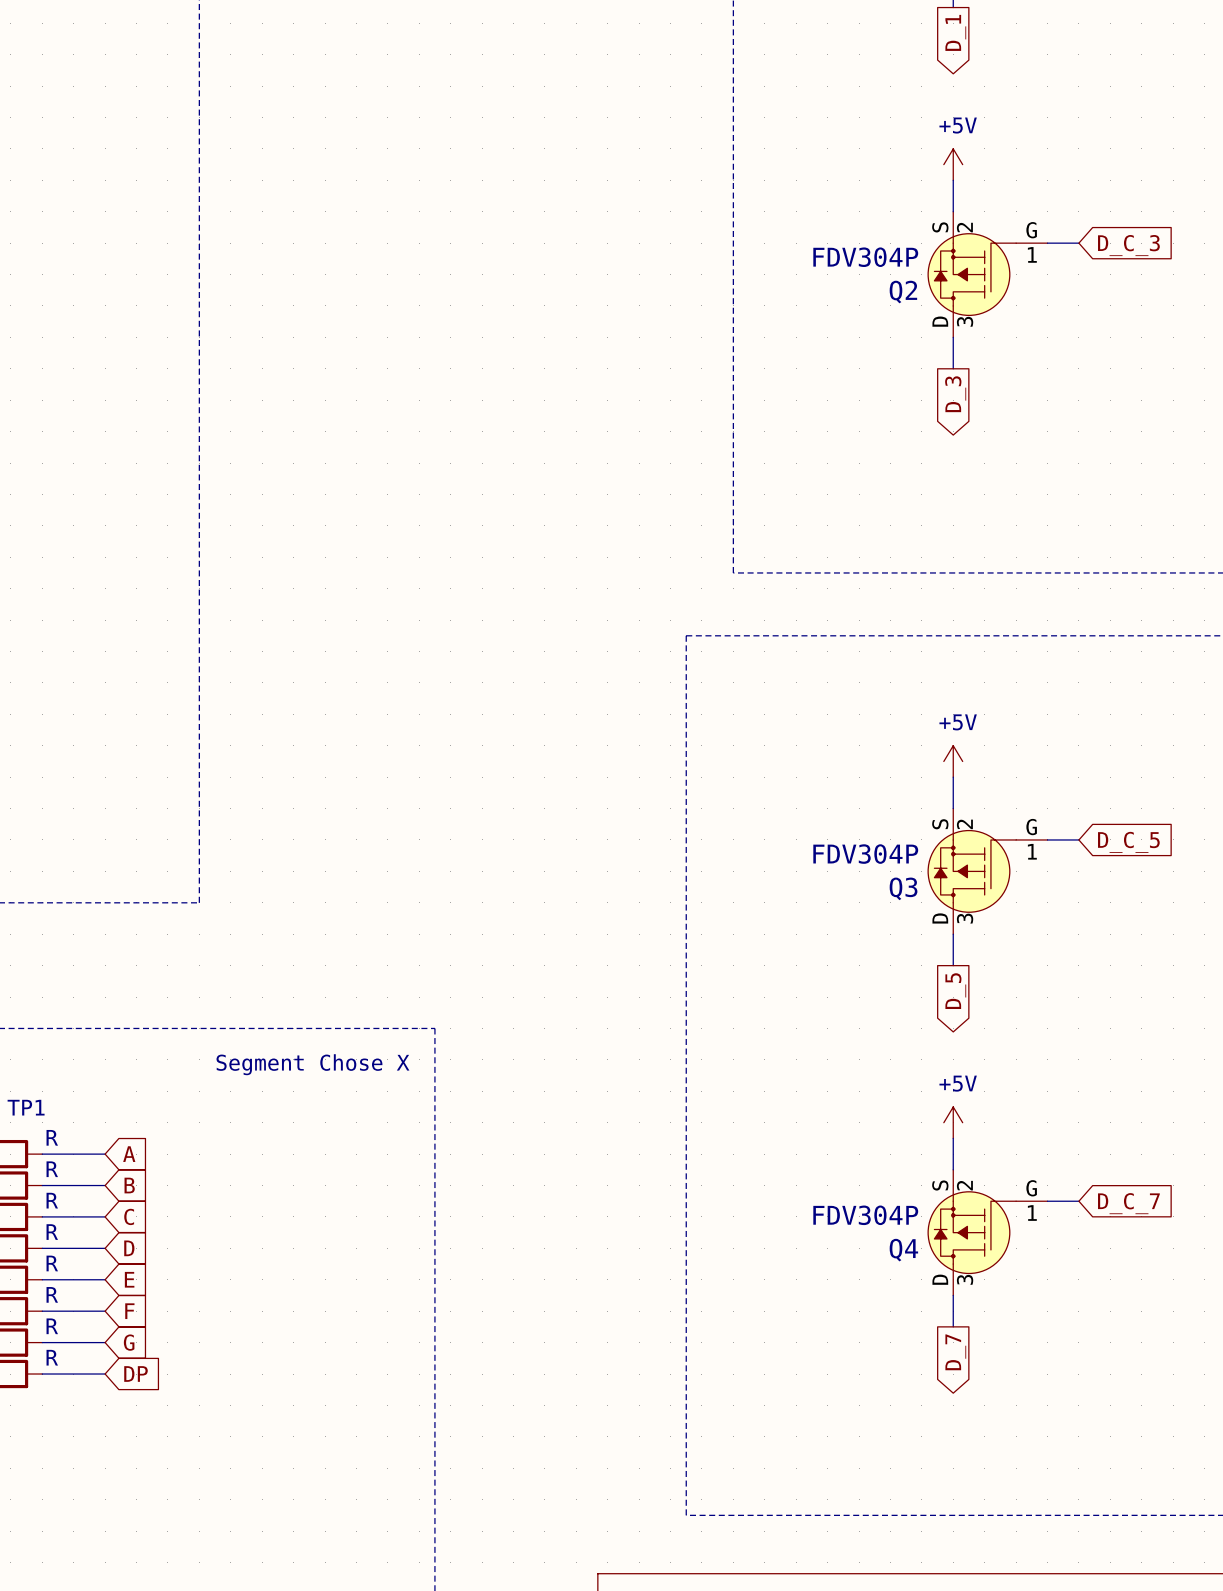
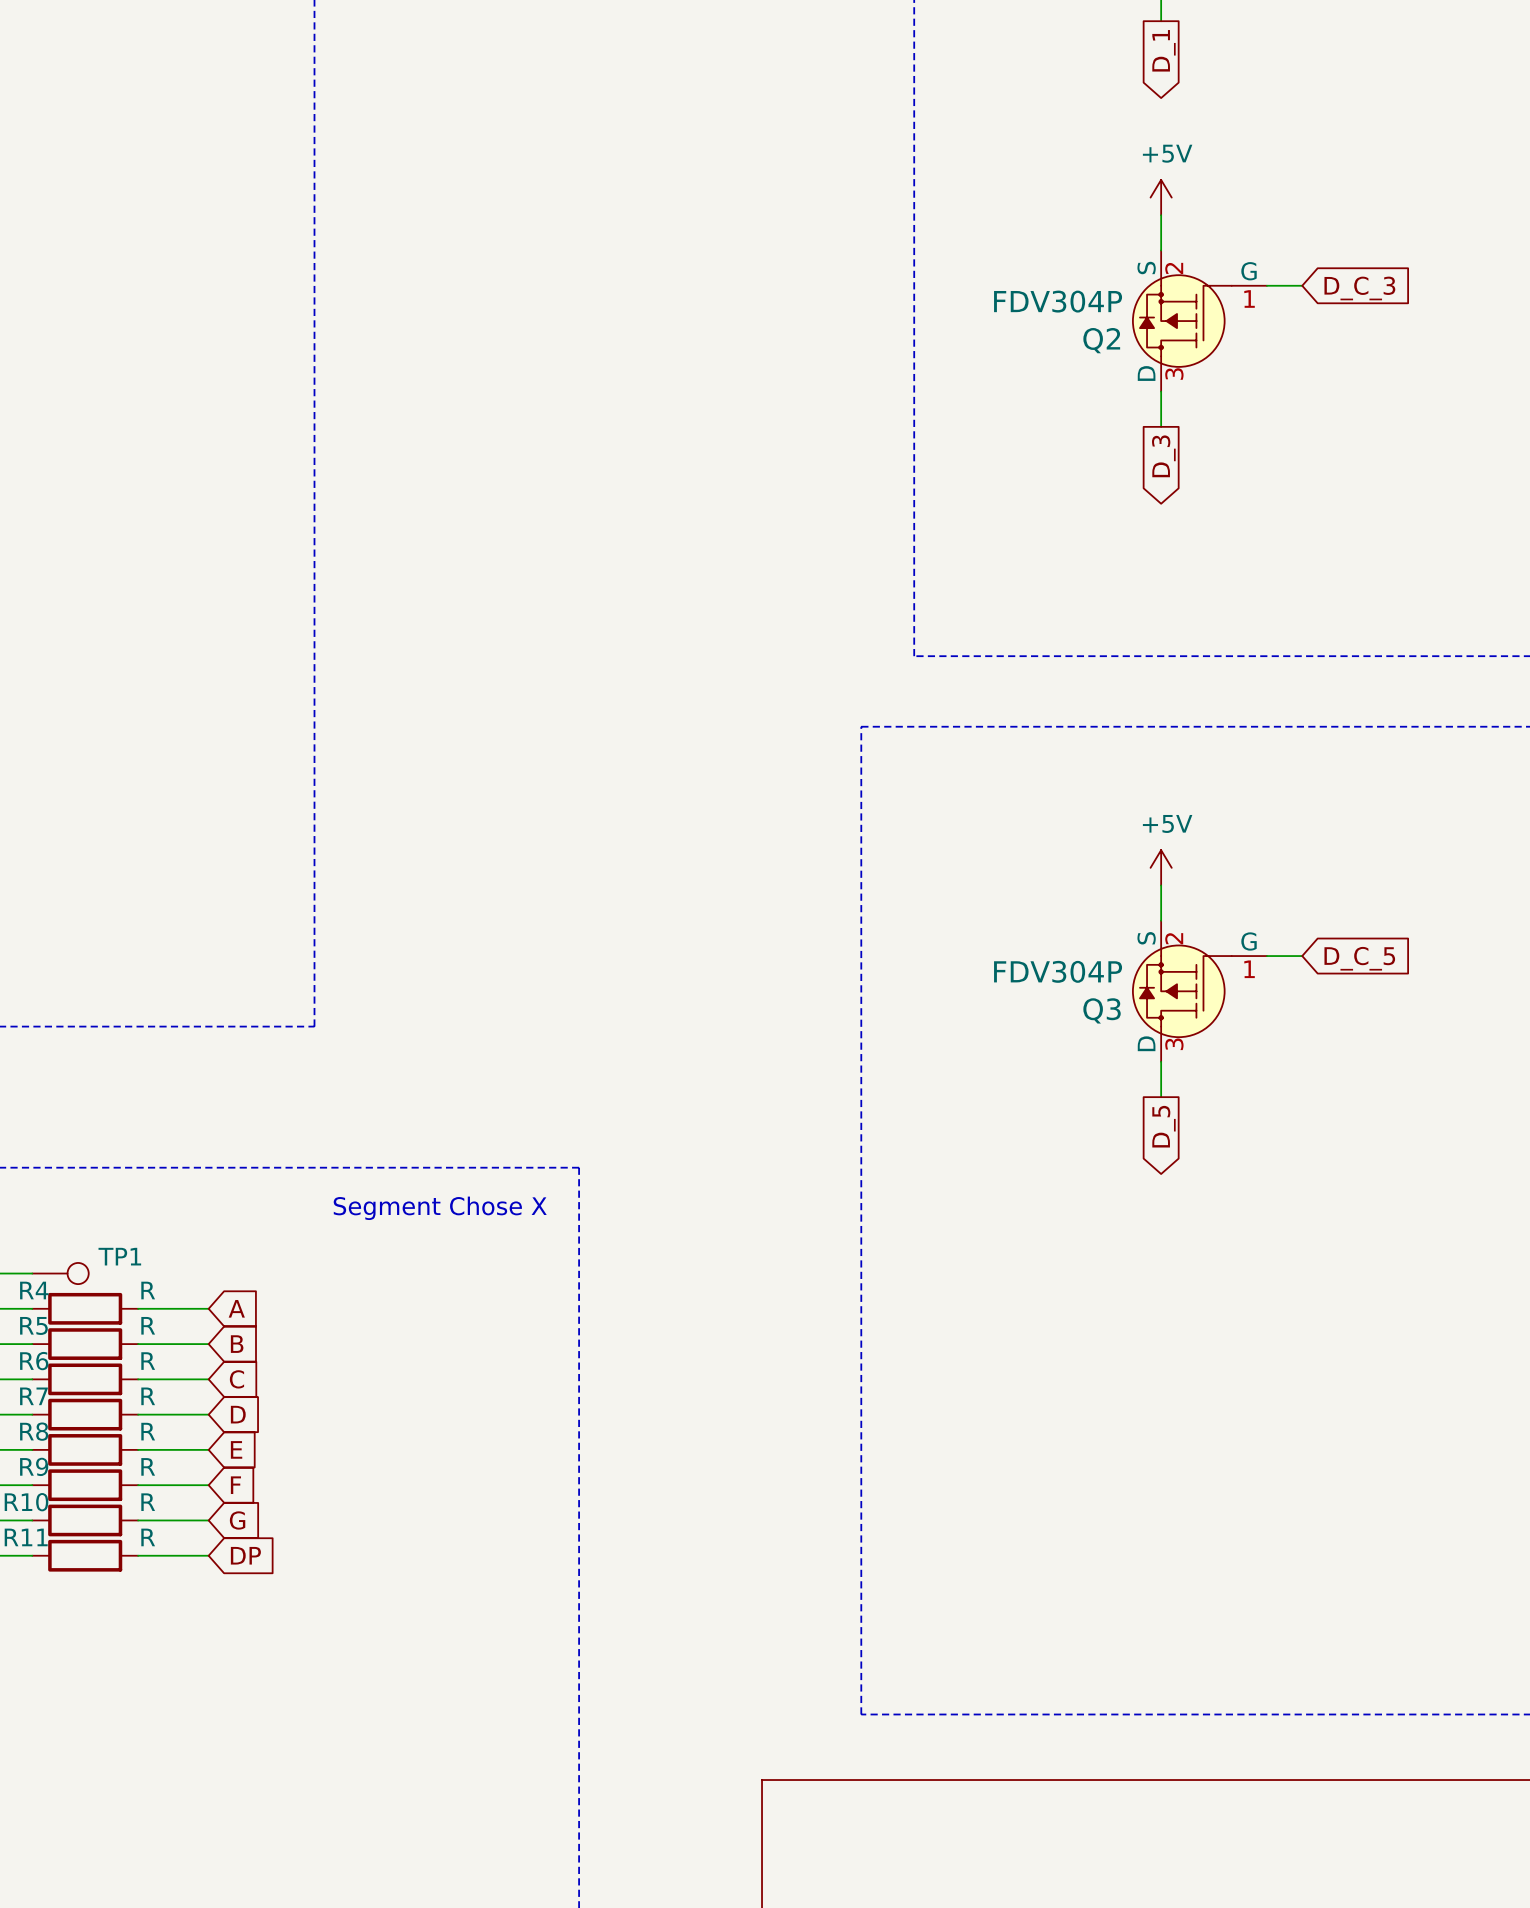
power symbol: +5V (953, 1122) -> none
wire: (953, 1138) (953, 1169) -> none
wire: (1047, 1201) (1078, 1201) -> none
global label: D_C_7 (1128, 1203) -> none
Q4: FDV304P (987, 1232) -> none
wire: (953, 1295) (953, 1326) -> none
global label: D_7 (955, 1352) -> none

